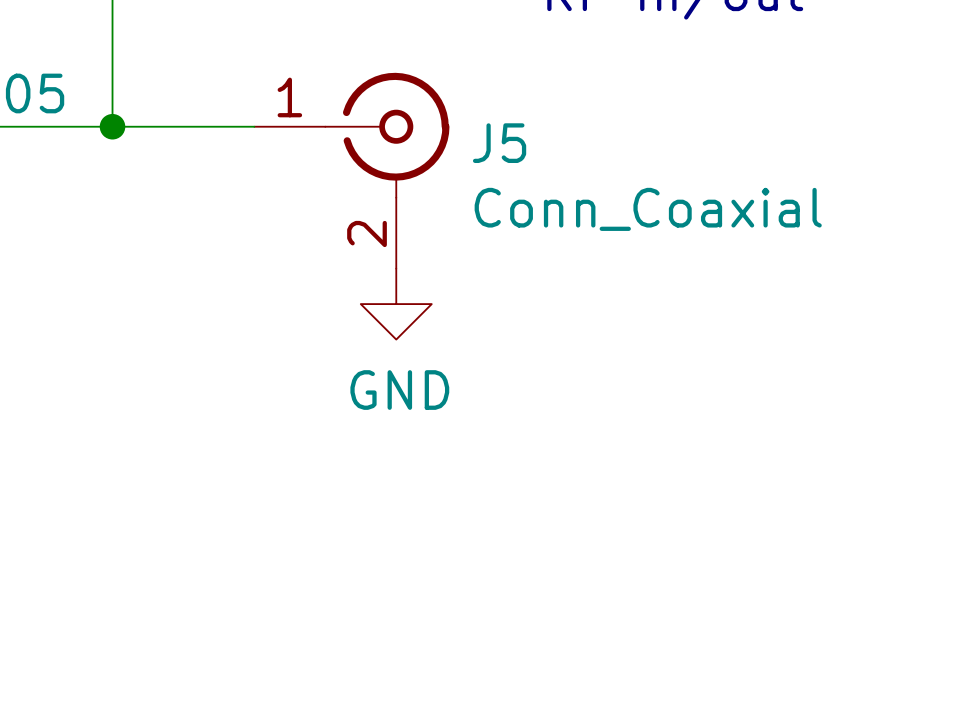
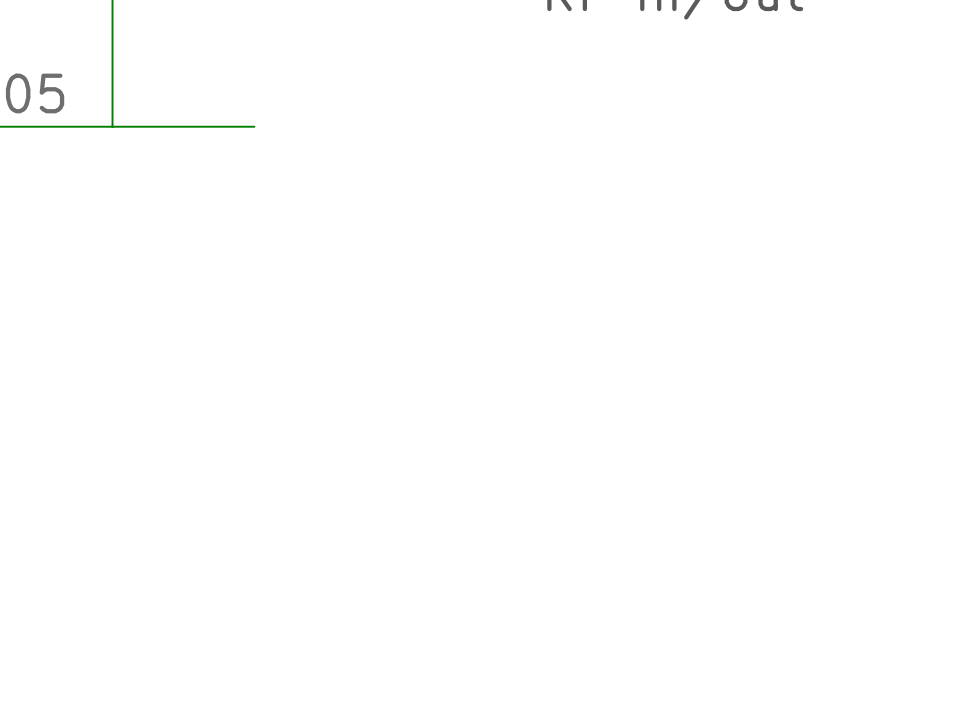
junction: (112, 126) -> none
J5: Conn_Coaxial (351, 170) -> none
power symbol: GND (396, 304) -> none

